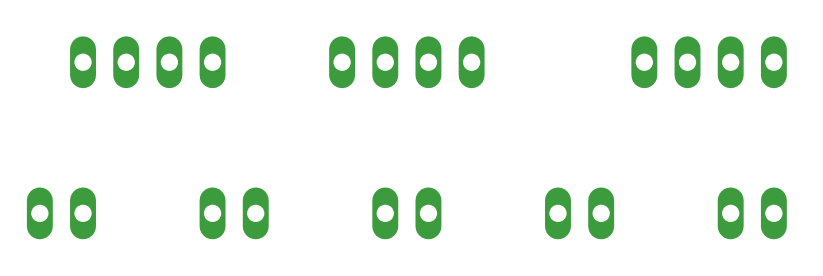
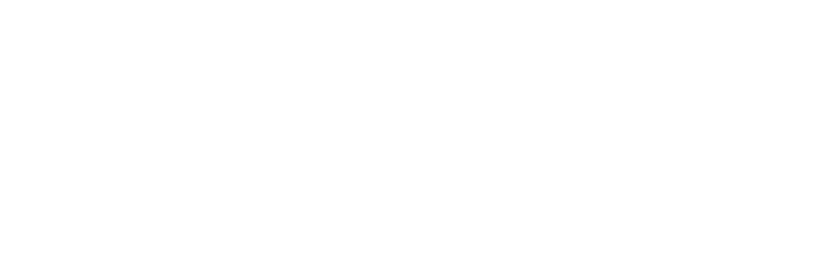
part: (147, 62) -> none
part: (406, 62) -> none
part: (709, 62) -> none
part: (61, 213) -> none
part: (234, 213) -> none
part: (406, 213) -> none
part: (579, 213) -> none
part: (752, 213) -> none

